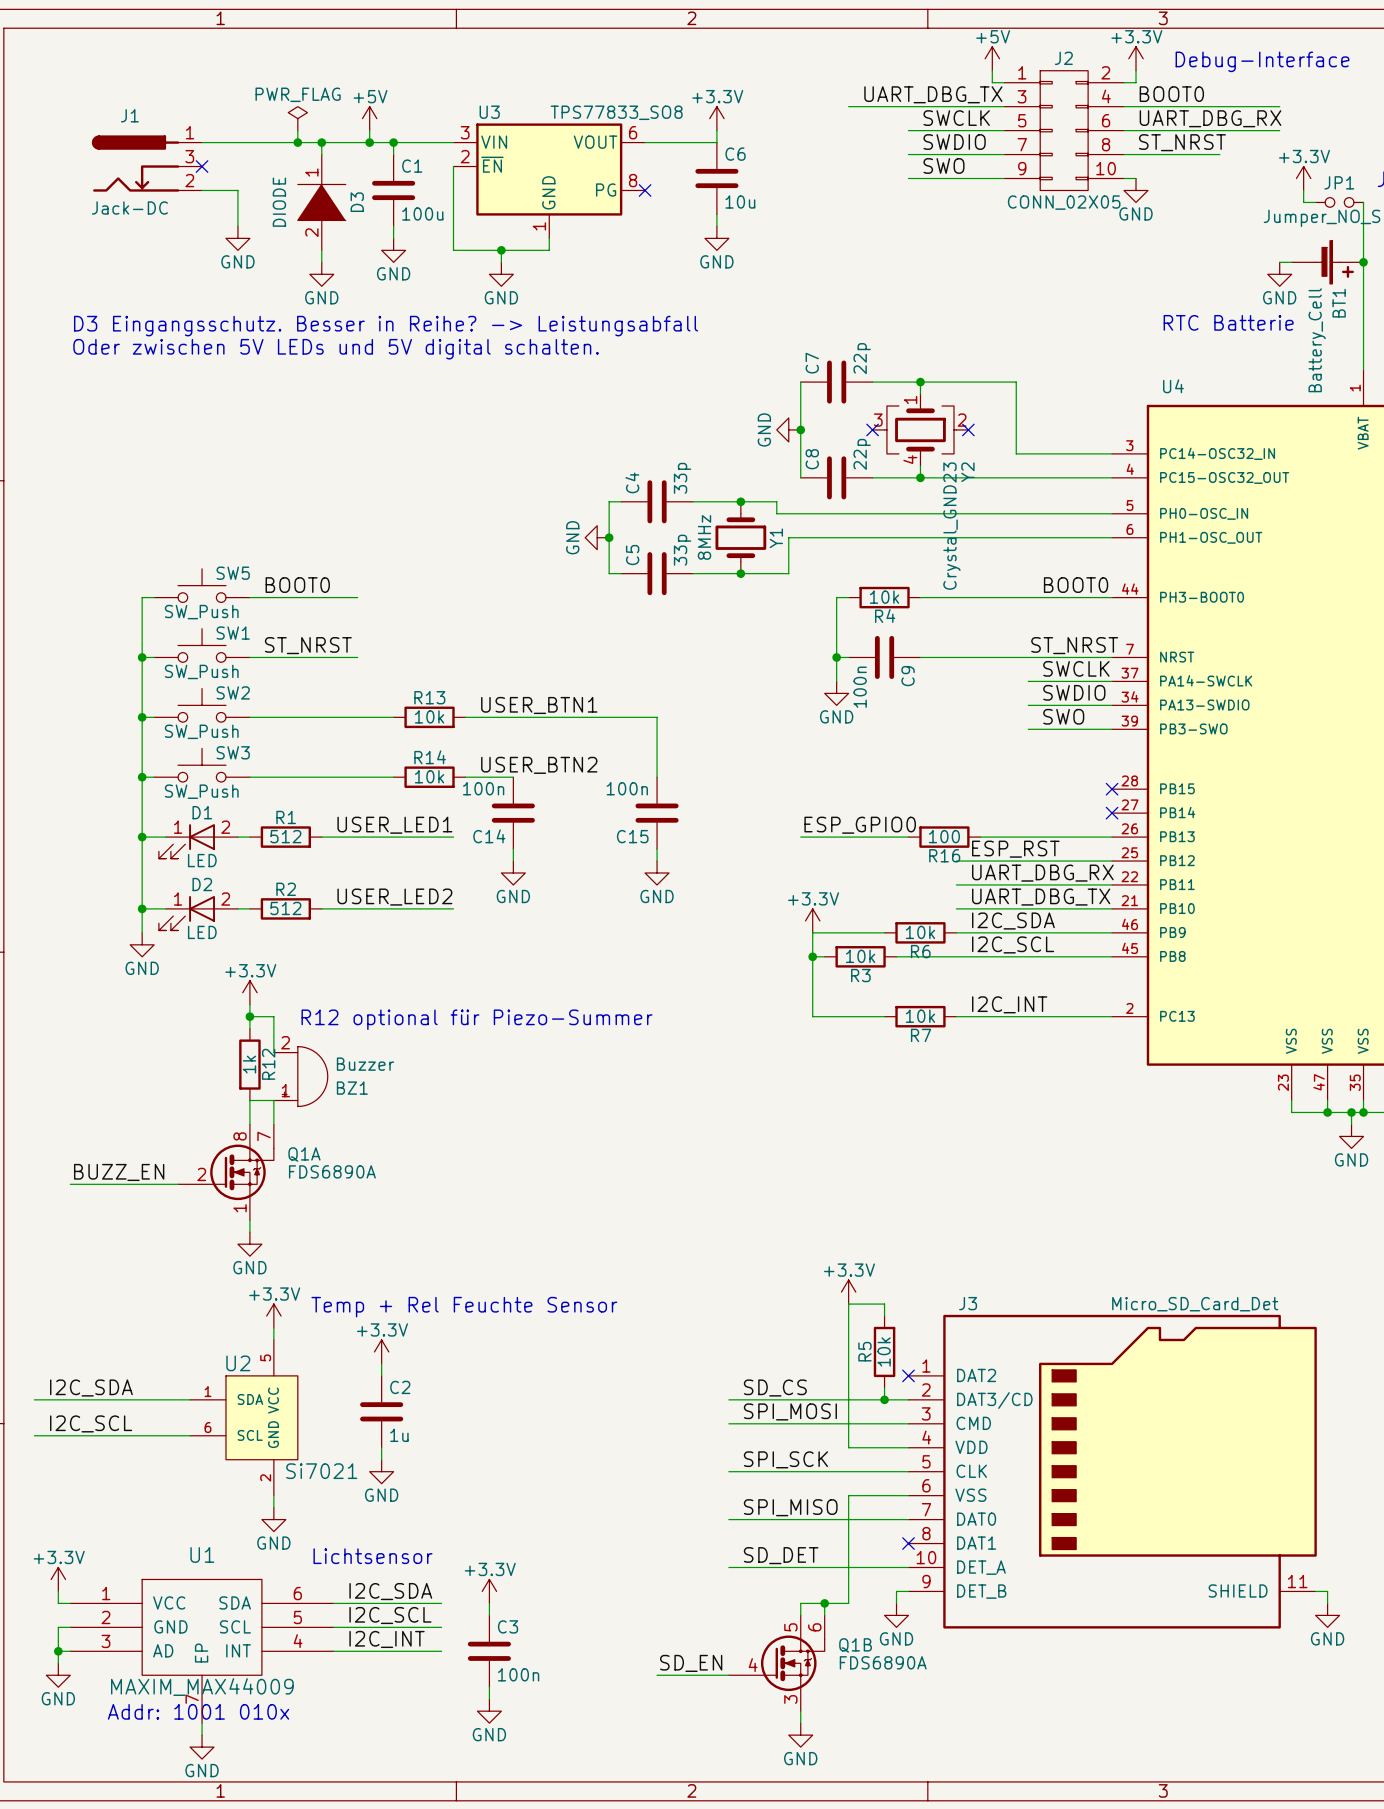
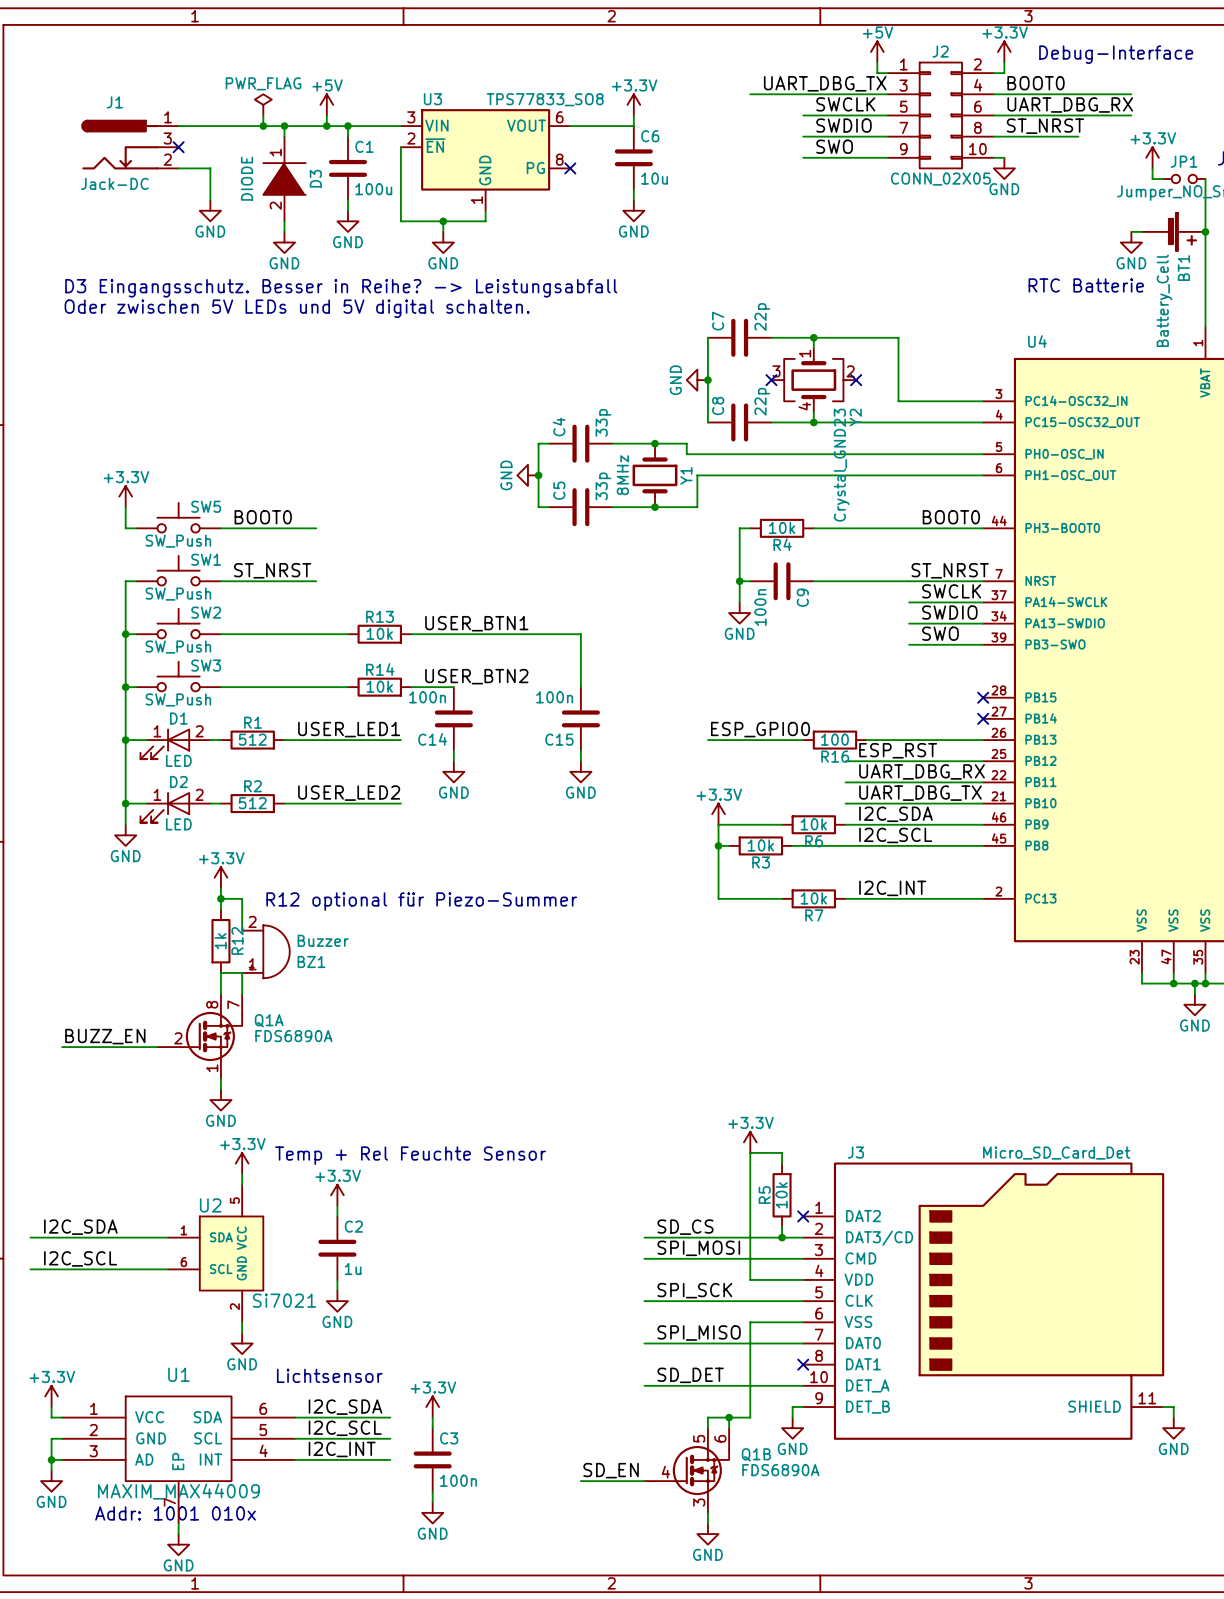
power symbol: none -> +3.3V (125, 496)
wire: (142, 597) (142, 657) -> (125, 528) (125, 507)
junction: (142, 657) -> none

